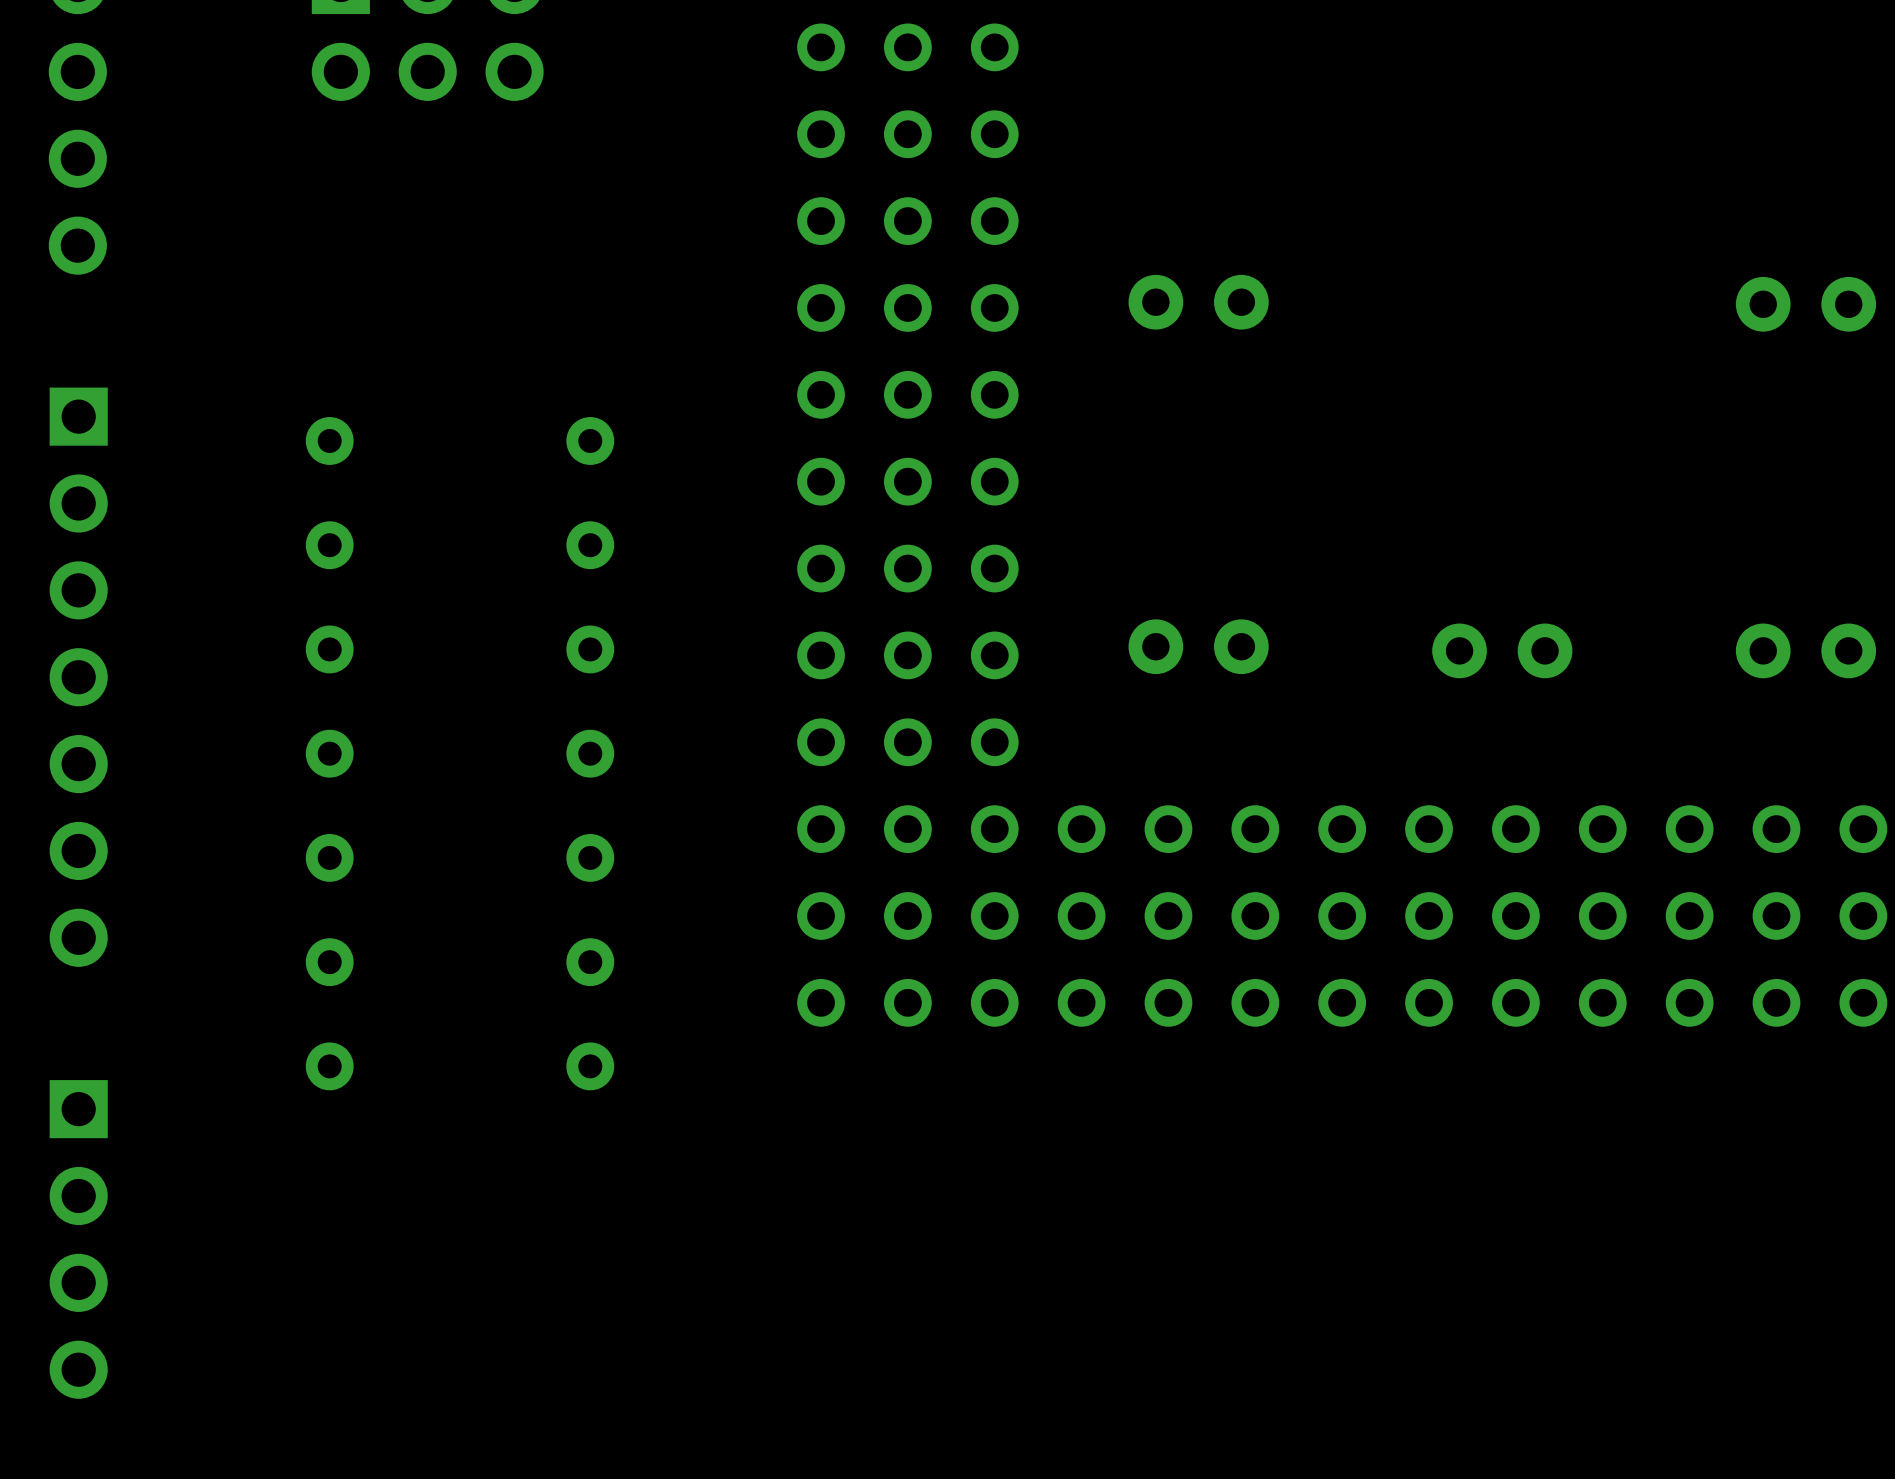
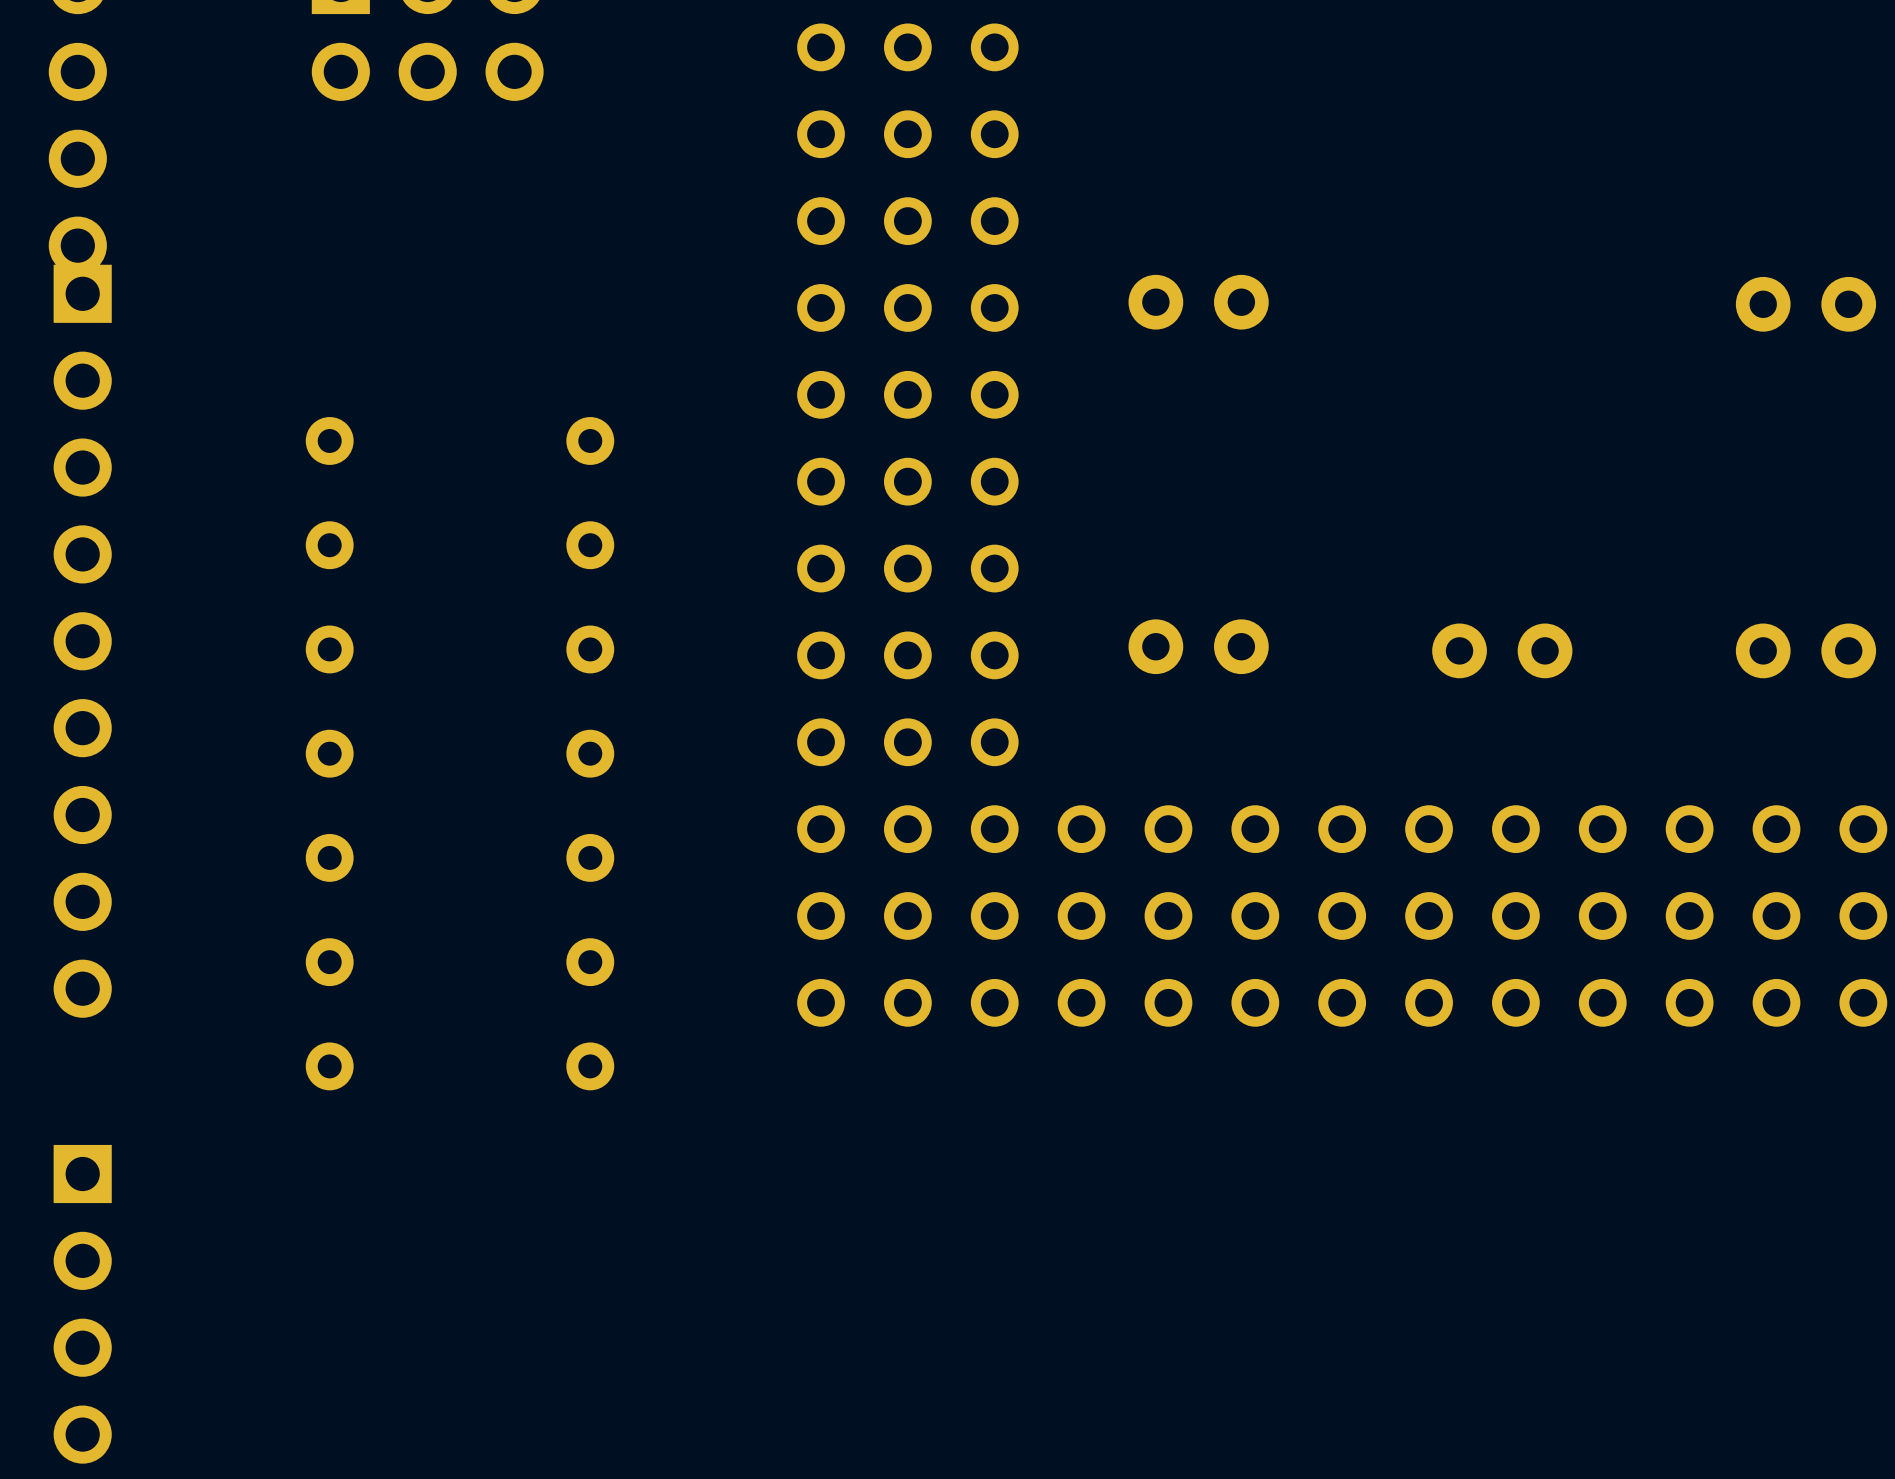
part: none -> (82, 641)
part: (78, 677) -> none
part position: (78, 1239) -> (82, 1304)

